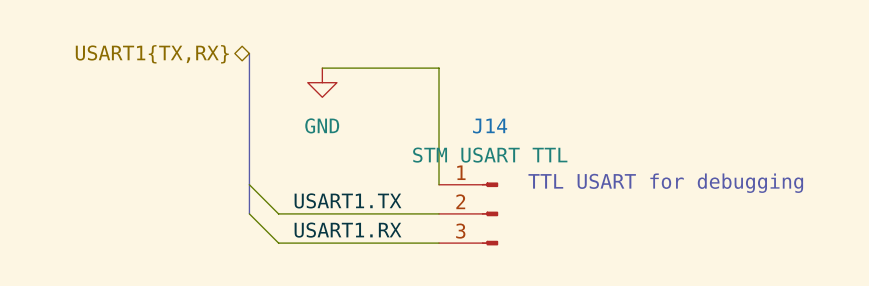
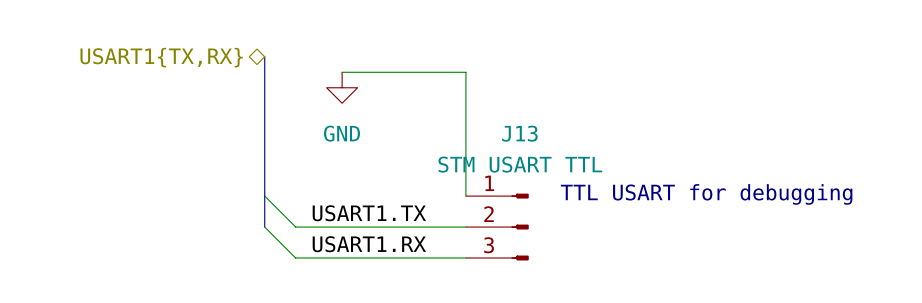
J14 name: J14 (490, 126) -> J13 (519, 133)

